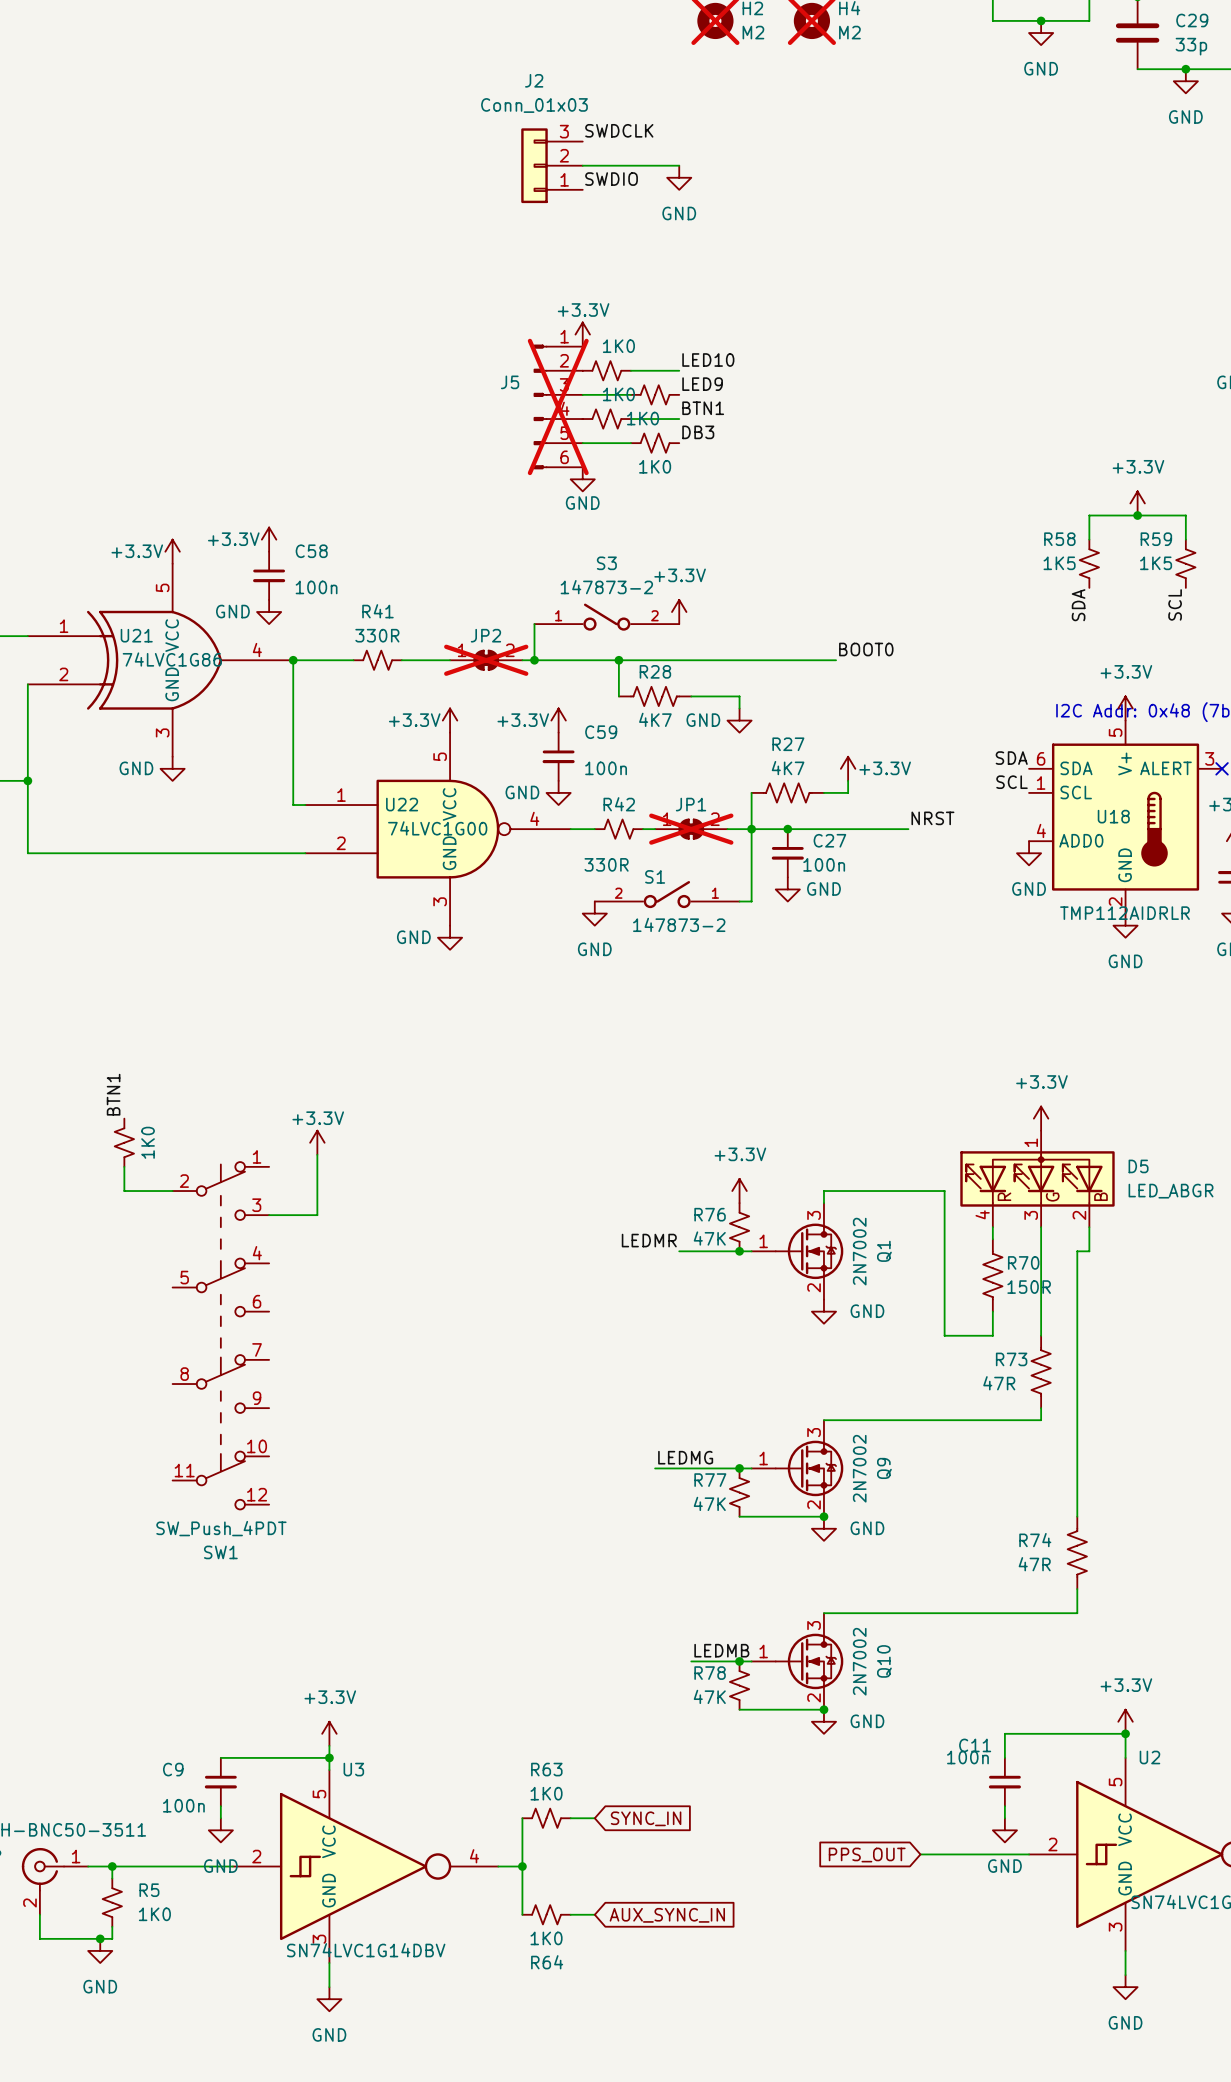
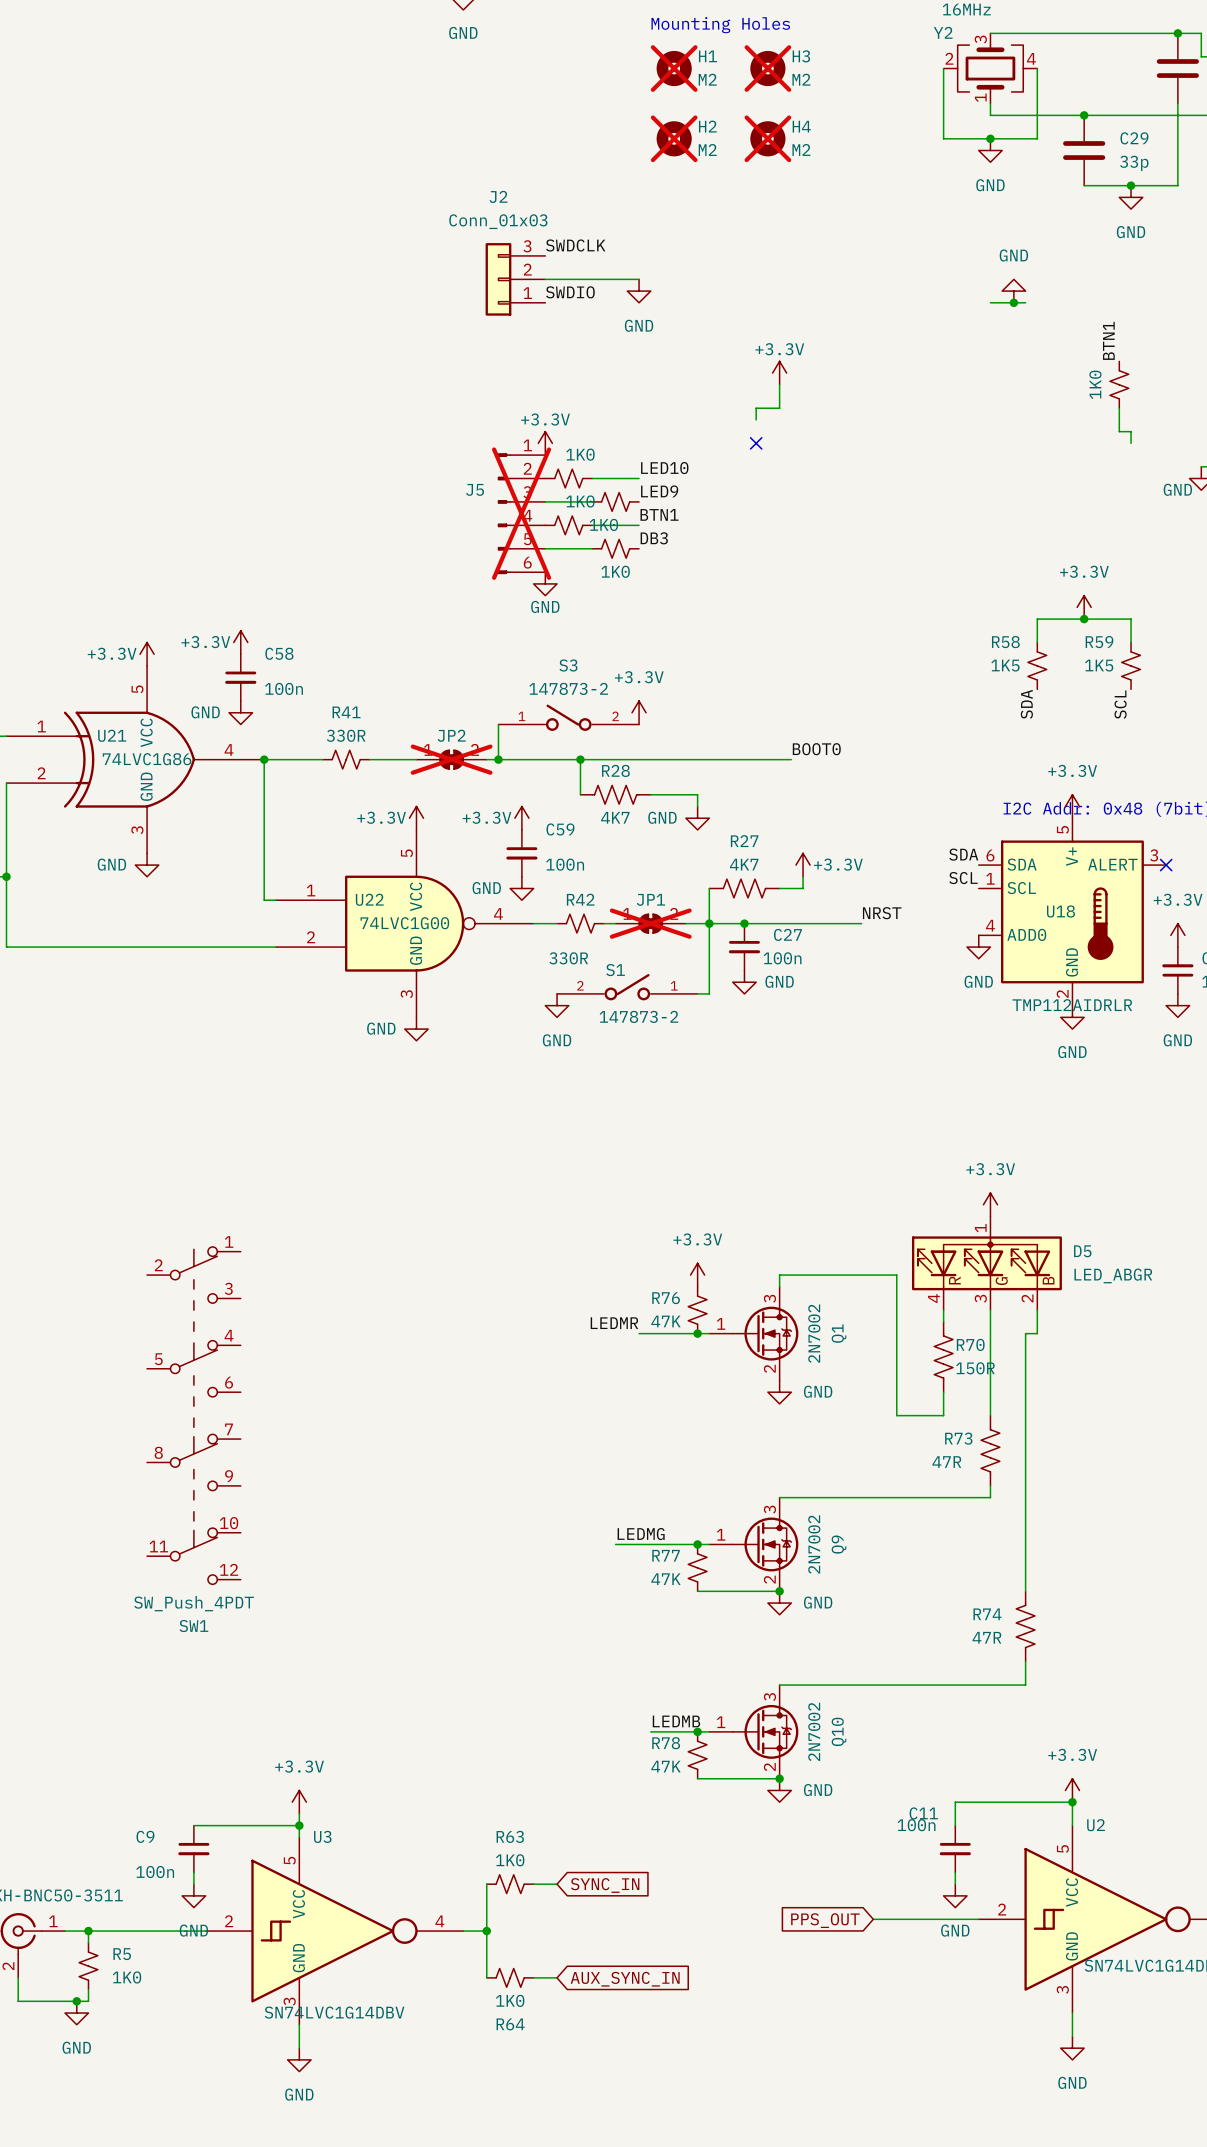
power symbol: none -> GND (1013, 291)
wire: none -> (990, 302) (1025, 302)
junction: none -> (1013, 302)
label: none -> BTN1 (1108, 340)
power symbol: none -> +3.3V (779, 373)
wire: none -> (779, 384) (779, 408) (756, 408) (756, 419)
part: none -> 1K0 (1119, 384)
wire: none -> (1119, 408) (1119, 431) (1131, 431) (1131, 443)
no-connect mark: none -> (756, 443)
label: BTN1 (113, 1094) -> none
part: 1K0 (124, 1142) -> none
power symbol: +3.3V (317, 1142) -> none
wire: (317, 1154) (317, 1215) (269, 1215) -> none
wire: (124, 1166) (124, 1191) (172, 1191) -> none

